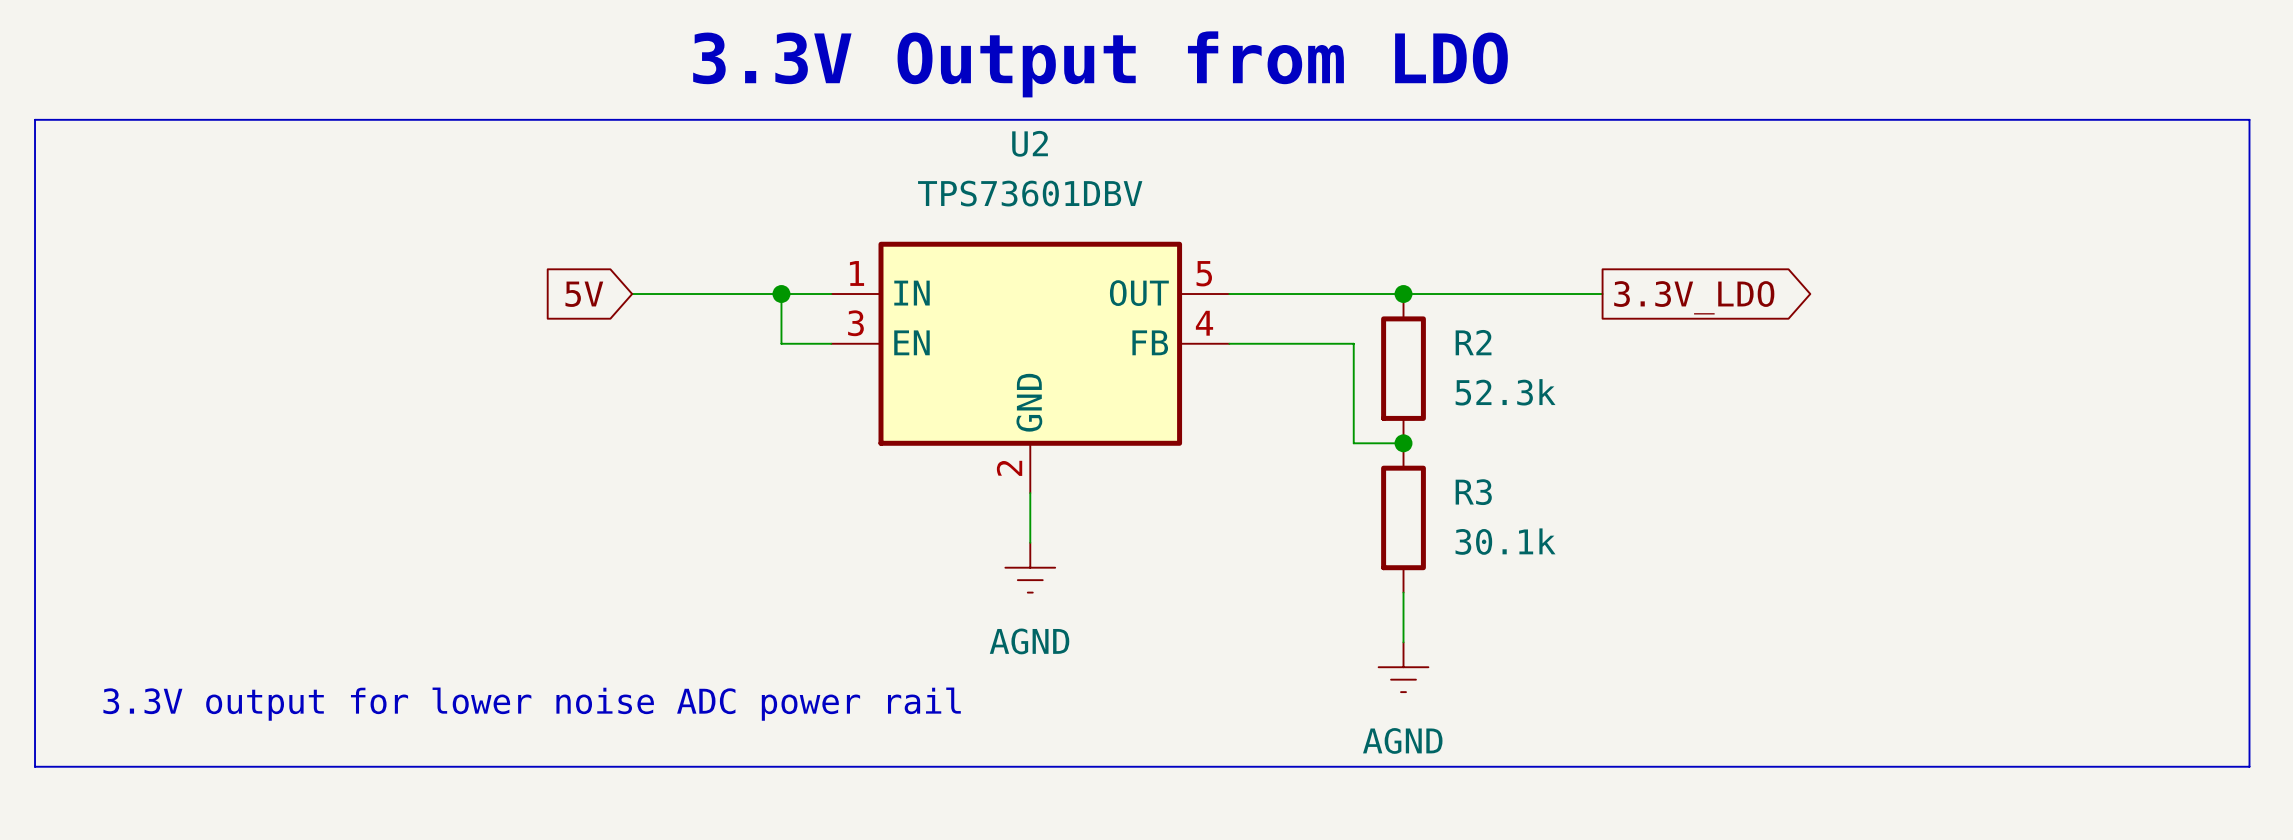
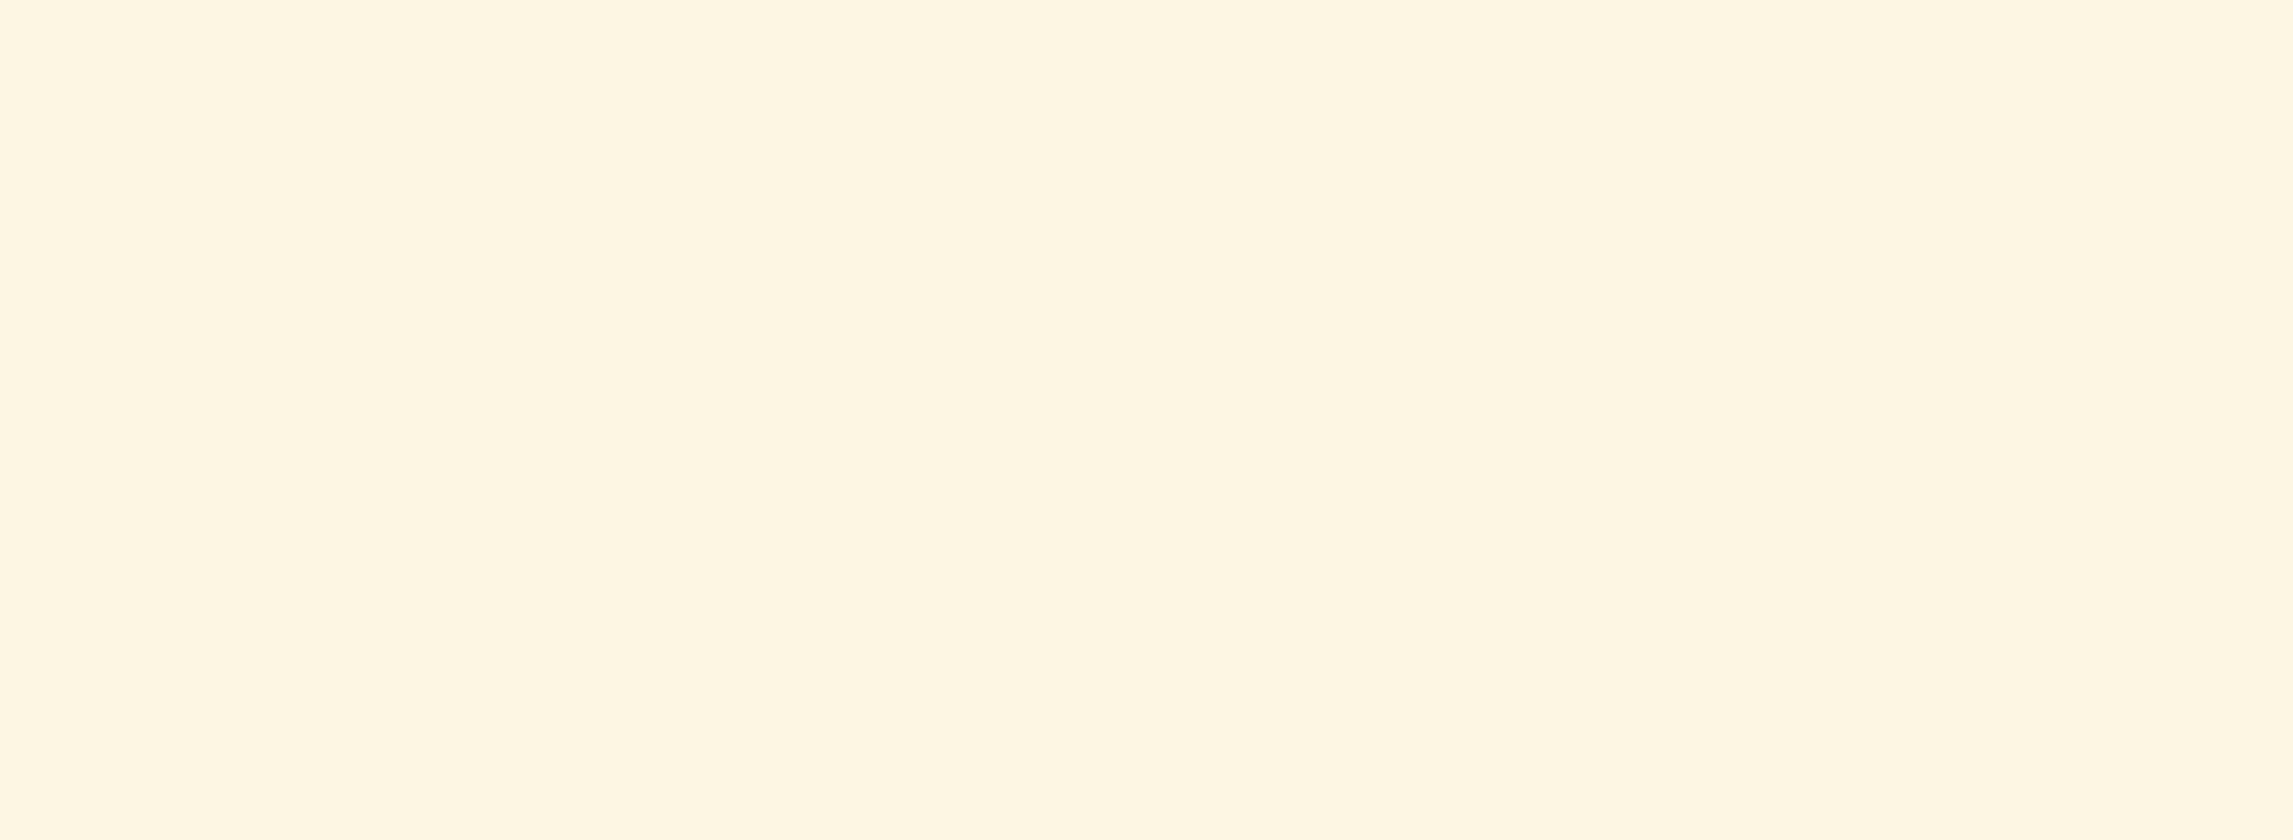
text: 3.3V Output from LDO (1100, 64) -> none
line: (35, 119) (35, 766) (2249, 766) (2249, 119) (35, 119) -> none
global label: 5V (584, 294) -> none
wire: (632, 294) (831, 294) -> none
wire: (781, 294) (781, 343) (831, 343) -> none
junction: (781, 294) -> none
wire: (1229, 294) (1602, 294) -> none
junction: (1403, 294) -> none
global label: 3.3V_LDO (1694, 297) -> none
wire: (1229, 343) (1353, 343) (1353, 443) (1403, 443) -> none
U2: TPS73601DBV (1030, 367) -> none
R2: 52.3k (1403, 368) -> none
junction: (1403, 443) -> none
wire: (1030, 493) (1030, 542) -> none
R3: 30.1k (1403, 517) -> none
power symbol: AGND (1030, 567) -> none
wire: (1403, 592) (1403, 642) -> none
power symbol: AGND (1403, 667) -> none
text: 3.3V output for lower noise ADC power rail (532, 704) -> none

